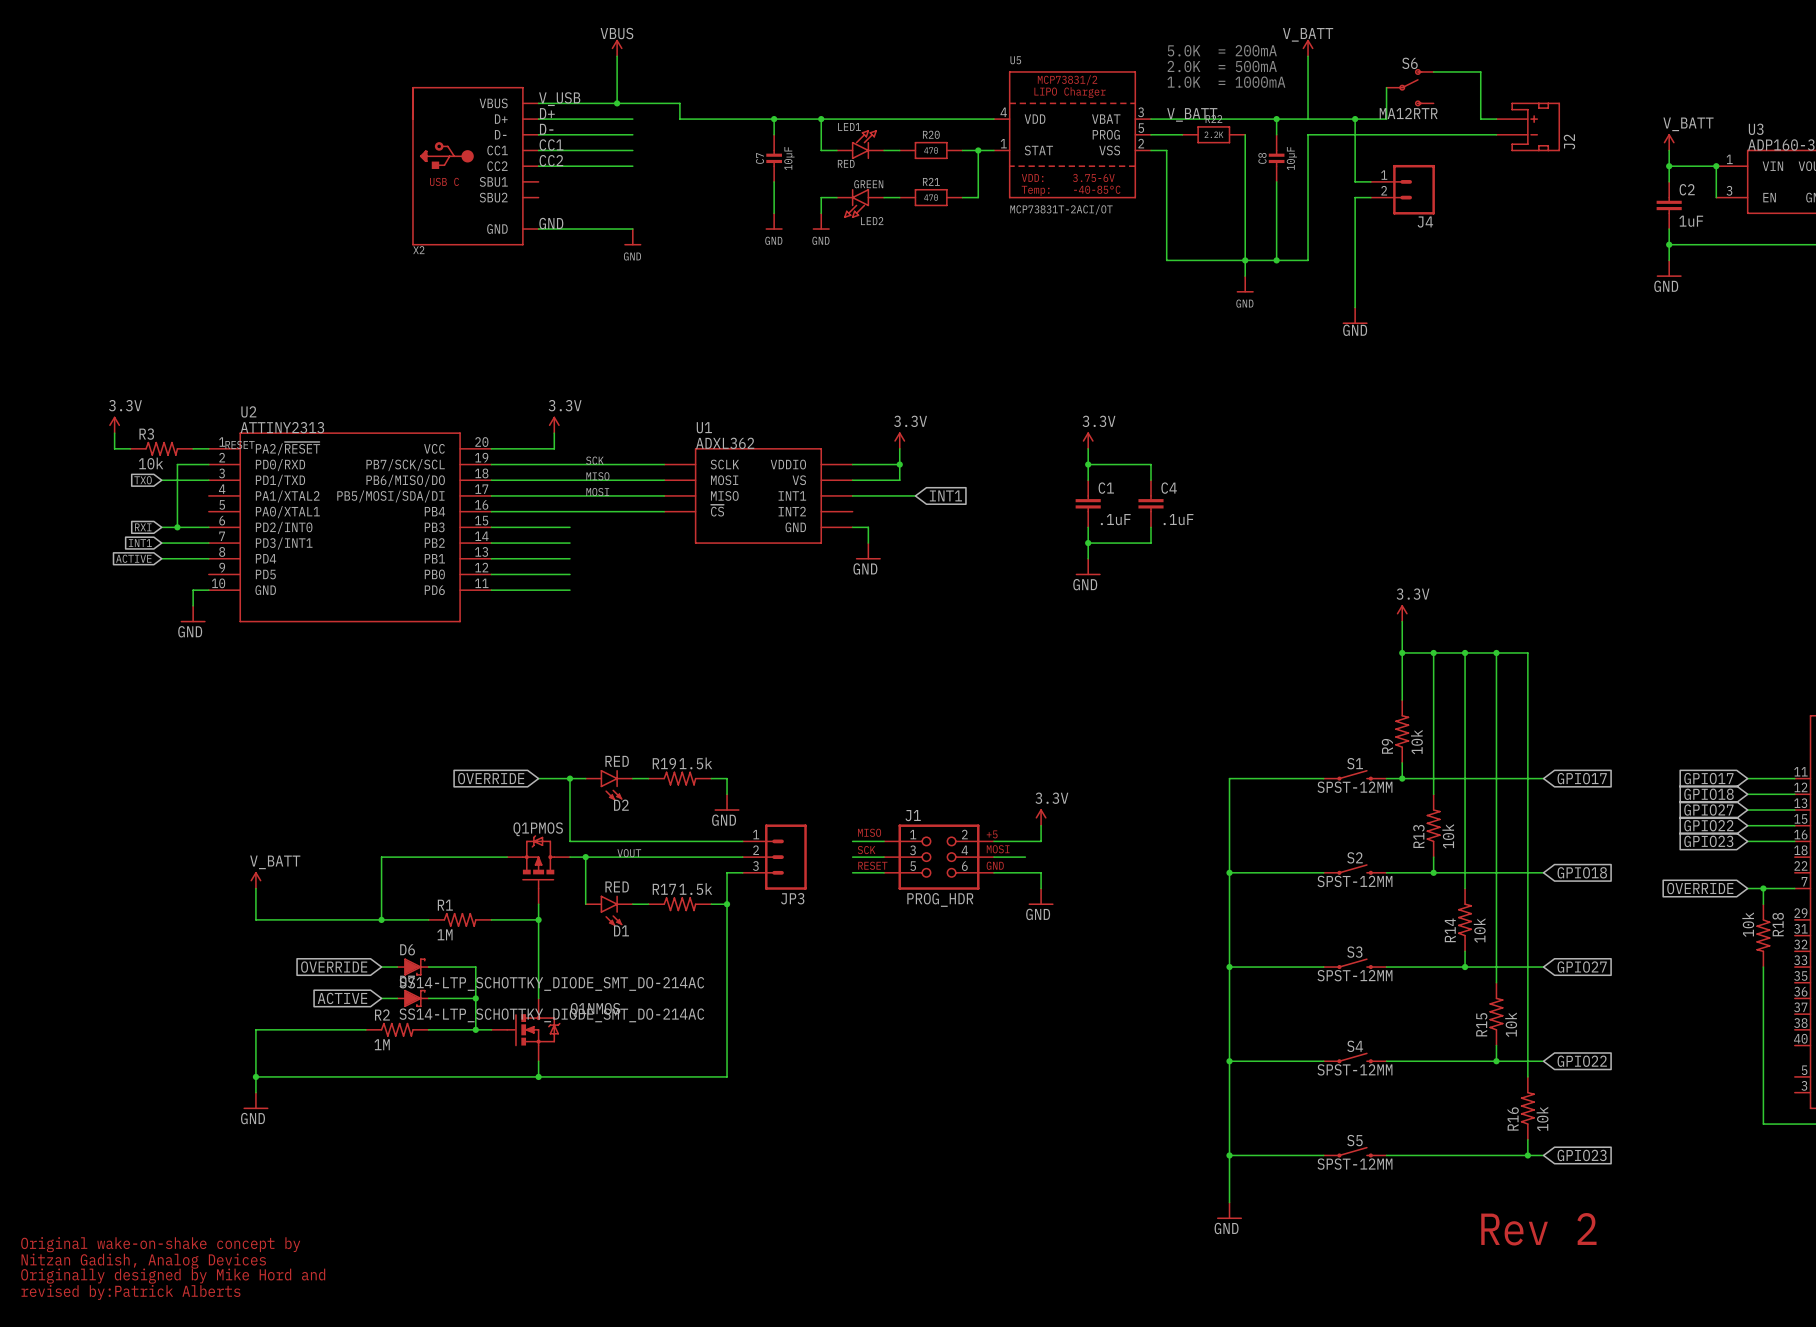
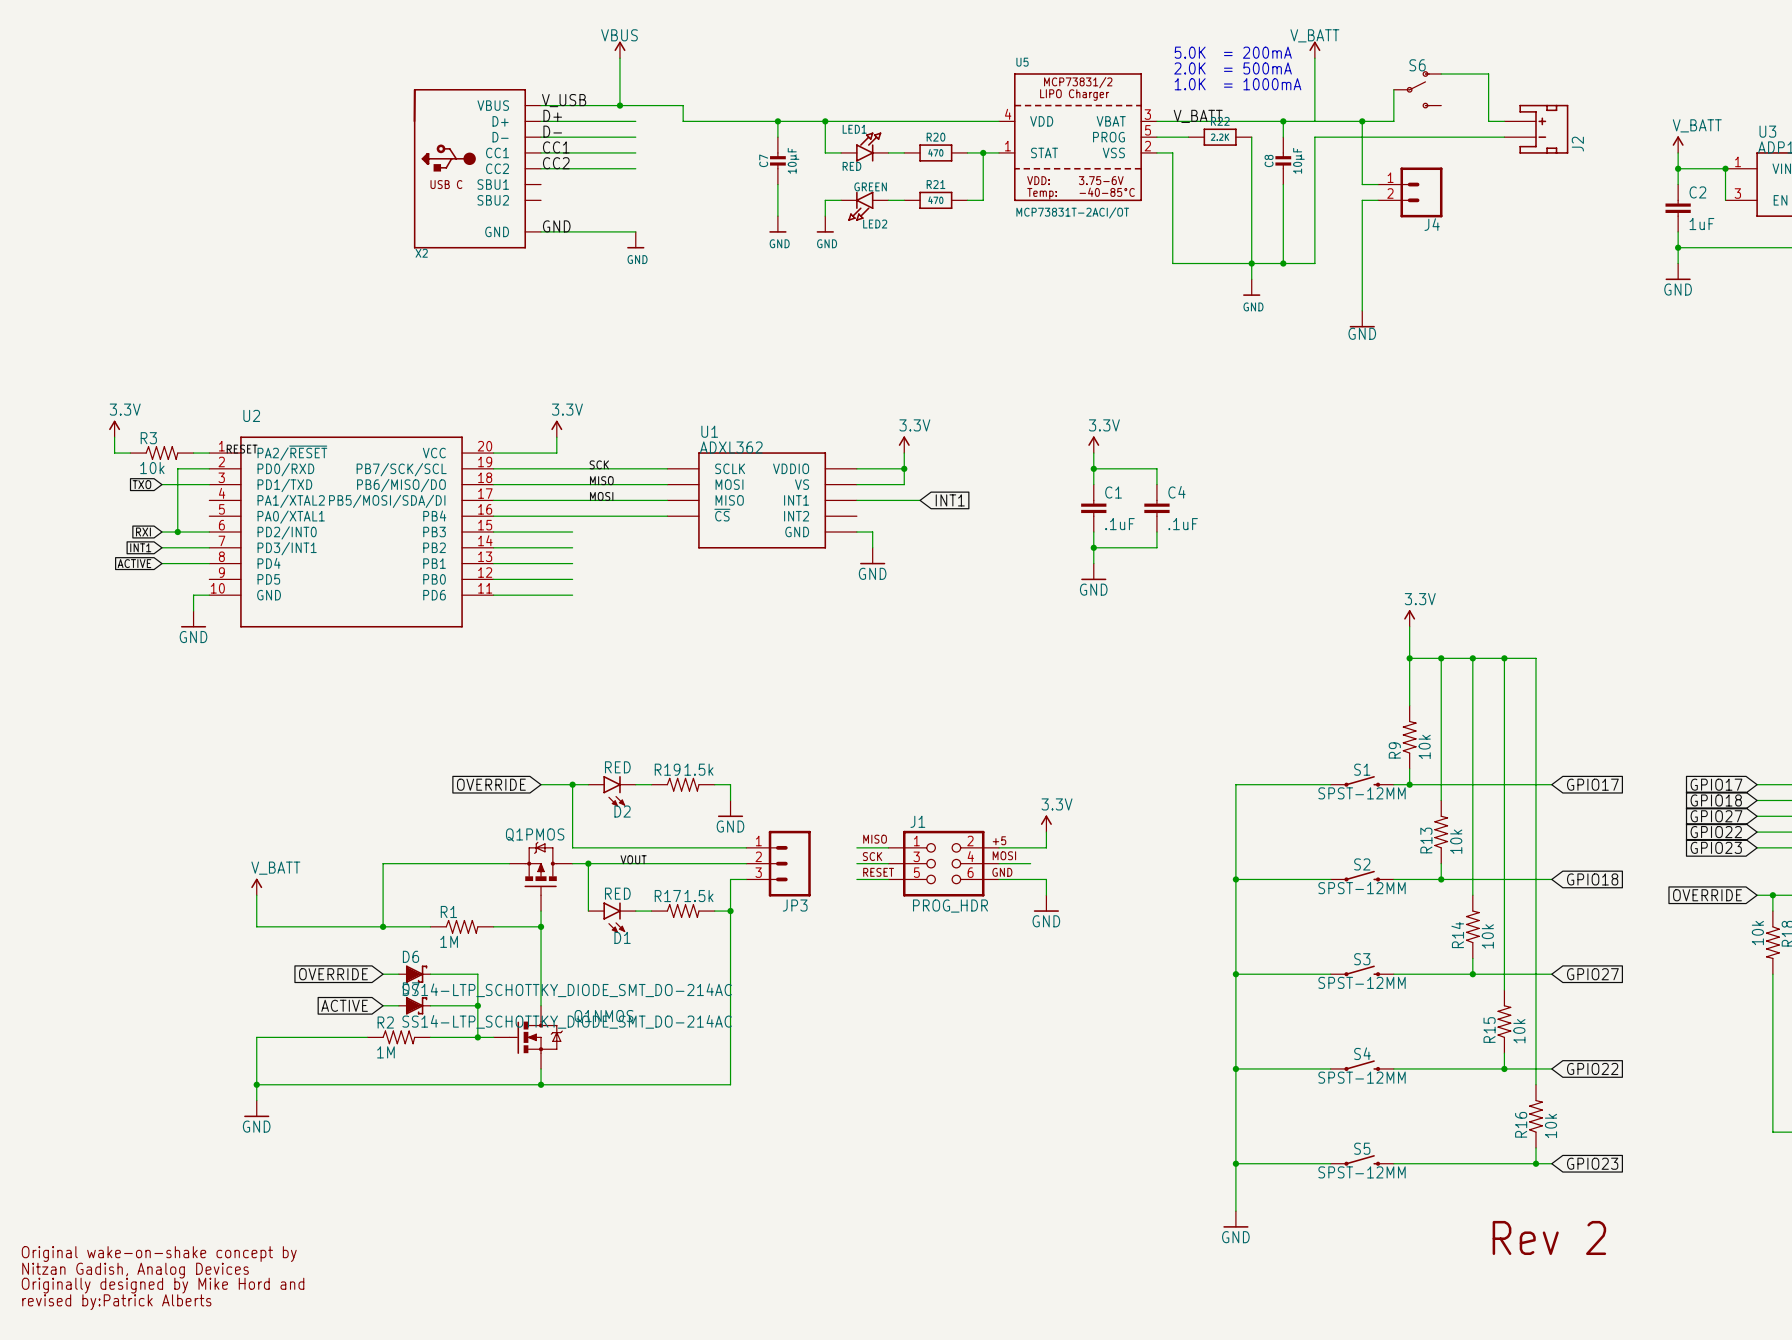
S6 value: MA12RTR (1408, 113) -> none
U2 value: ATTINY2313 (282, 427) -> none

